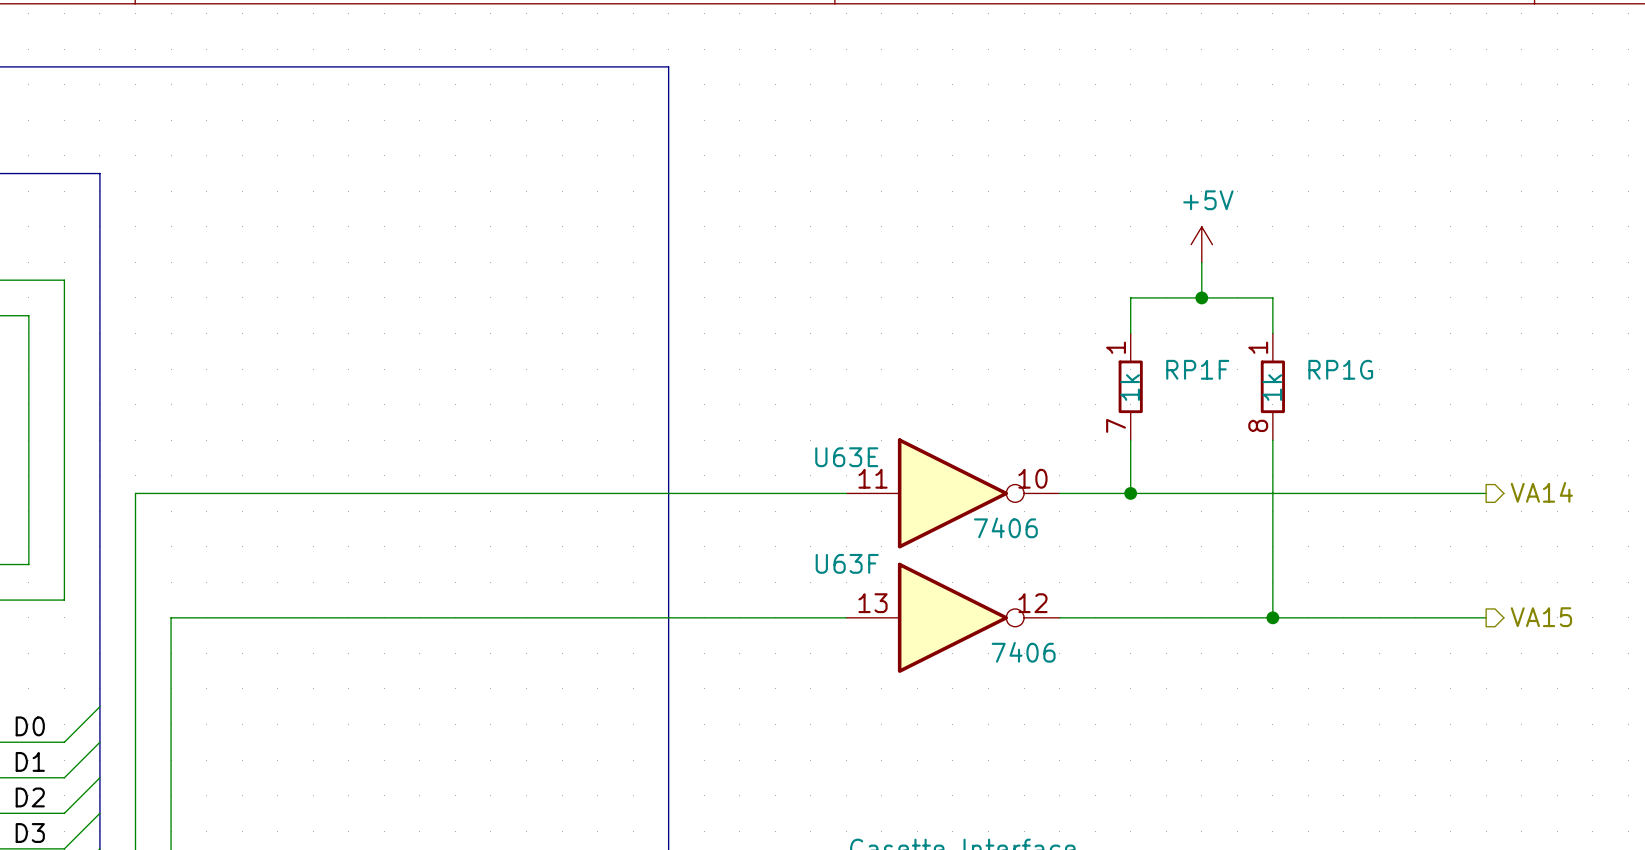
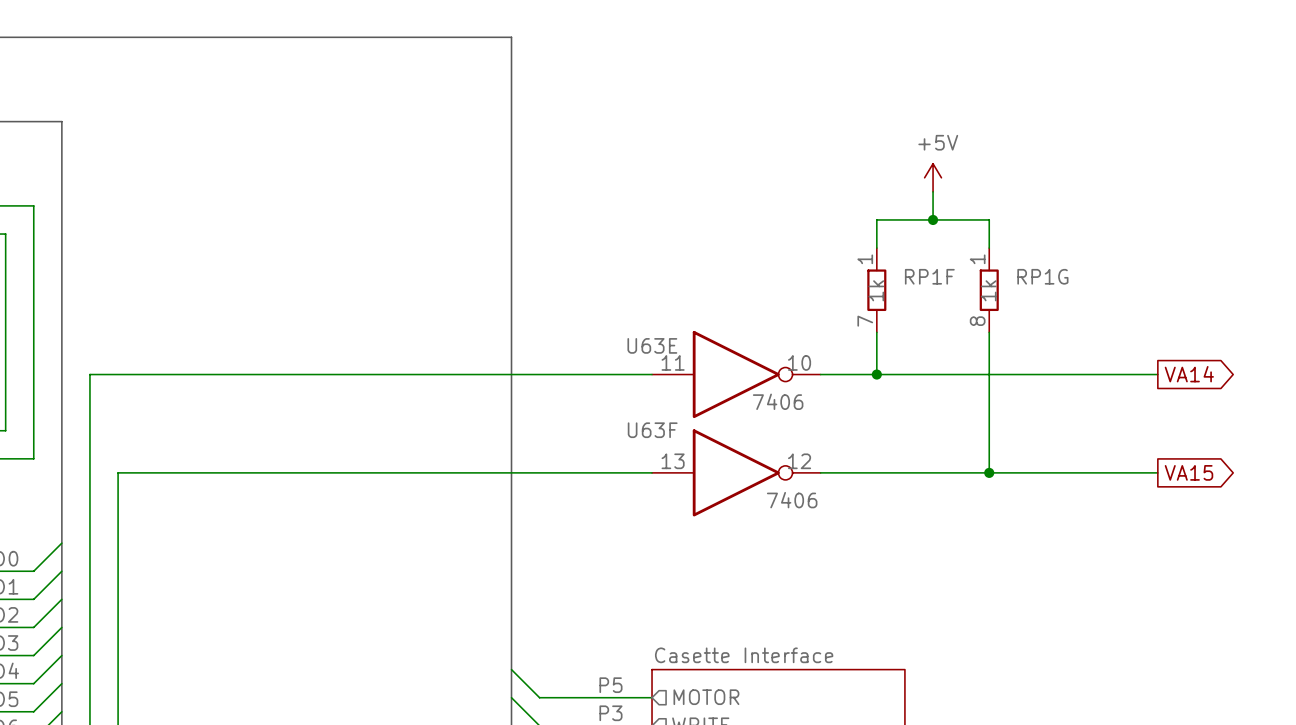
hierarchical label: VA14 (1541, 492) -> none
global label: none -> VA14 (1189, 374)
global label: none -> VA15 (1188, 472)
hierarchical label: VA15 (1541, 617) -> none

